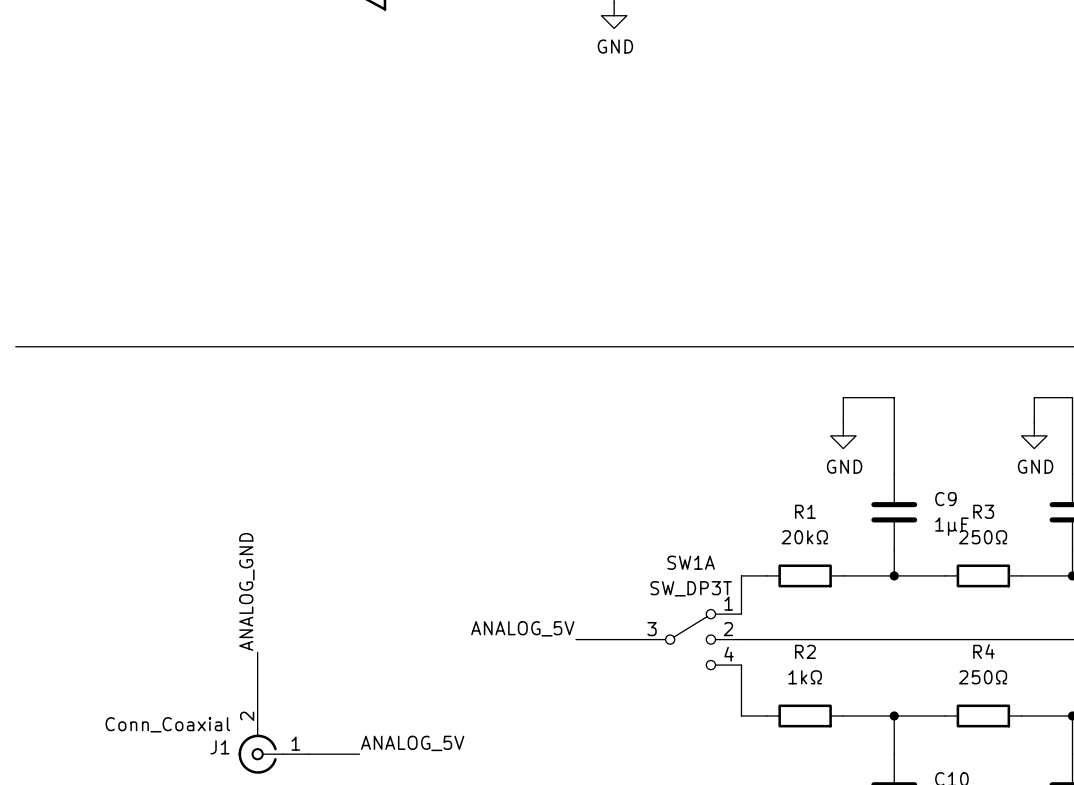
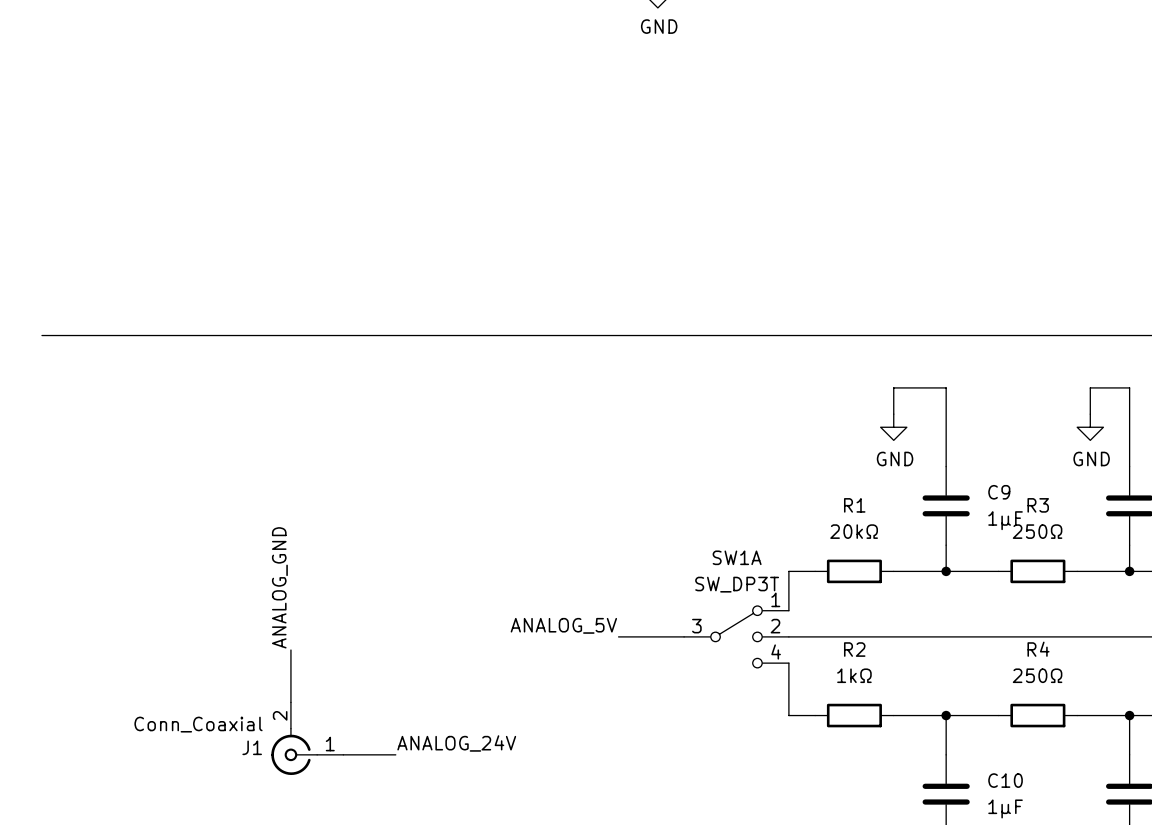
label: ANALOG_5V (412, 743) -> ANALOG_24V (456, 743)

